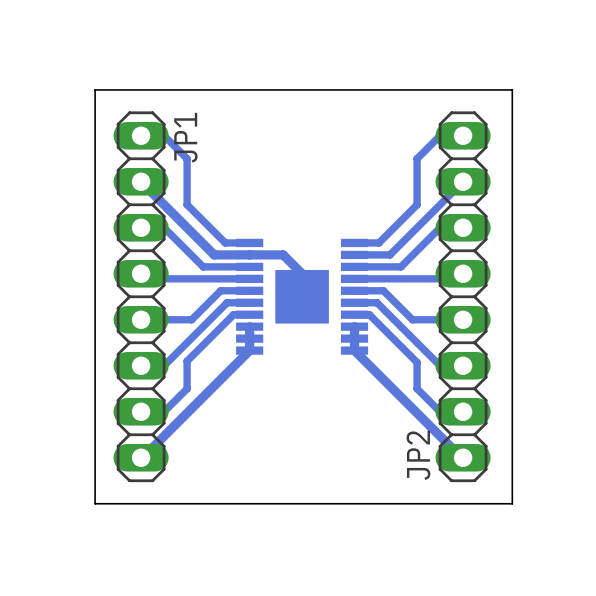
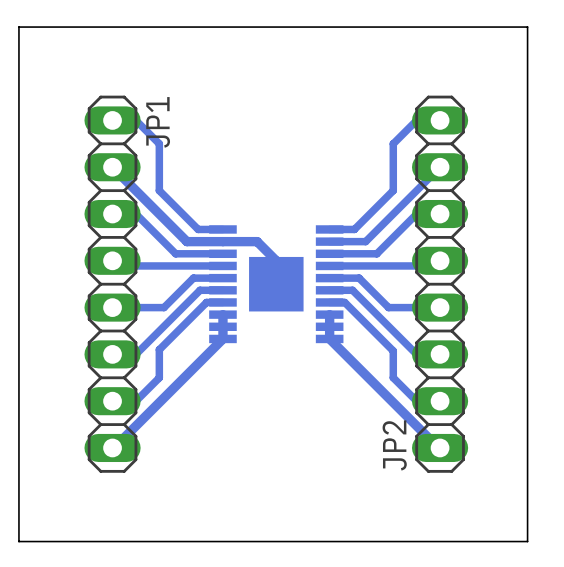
board edge: (95, 89) (512, 89) (512, 503) (95, 503) (95, 89) -> (18, 27) (18, 541) (527, 541) (527, 27) (18, 27)

